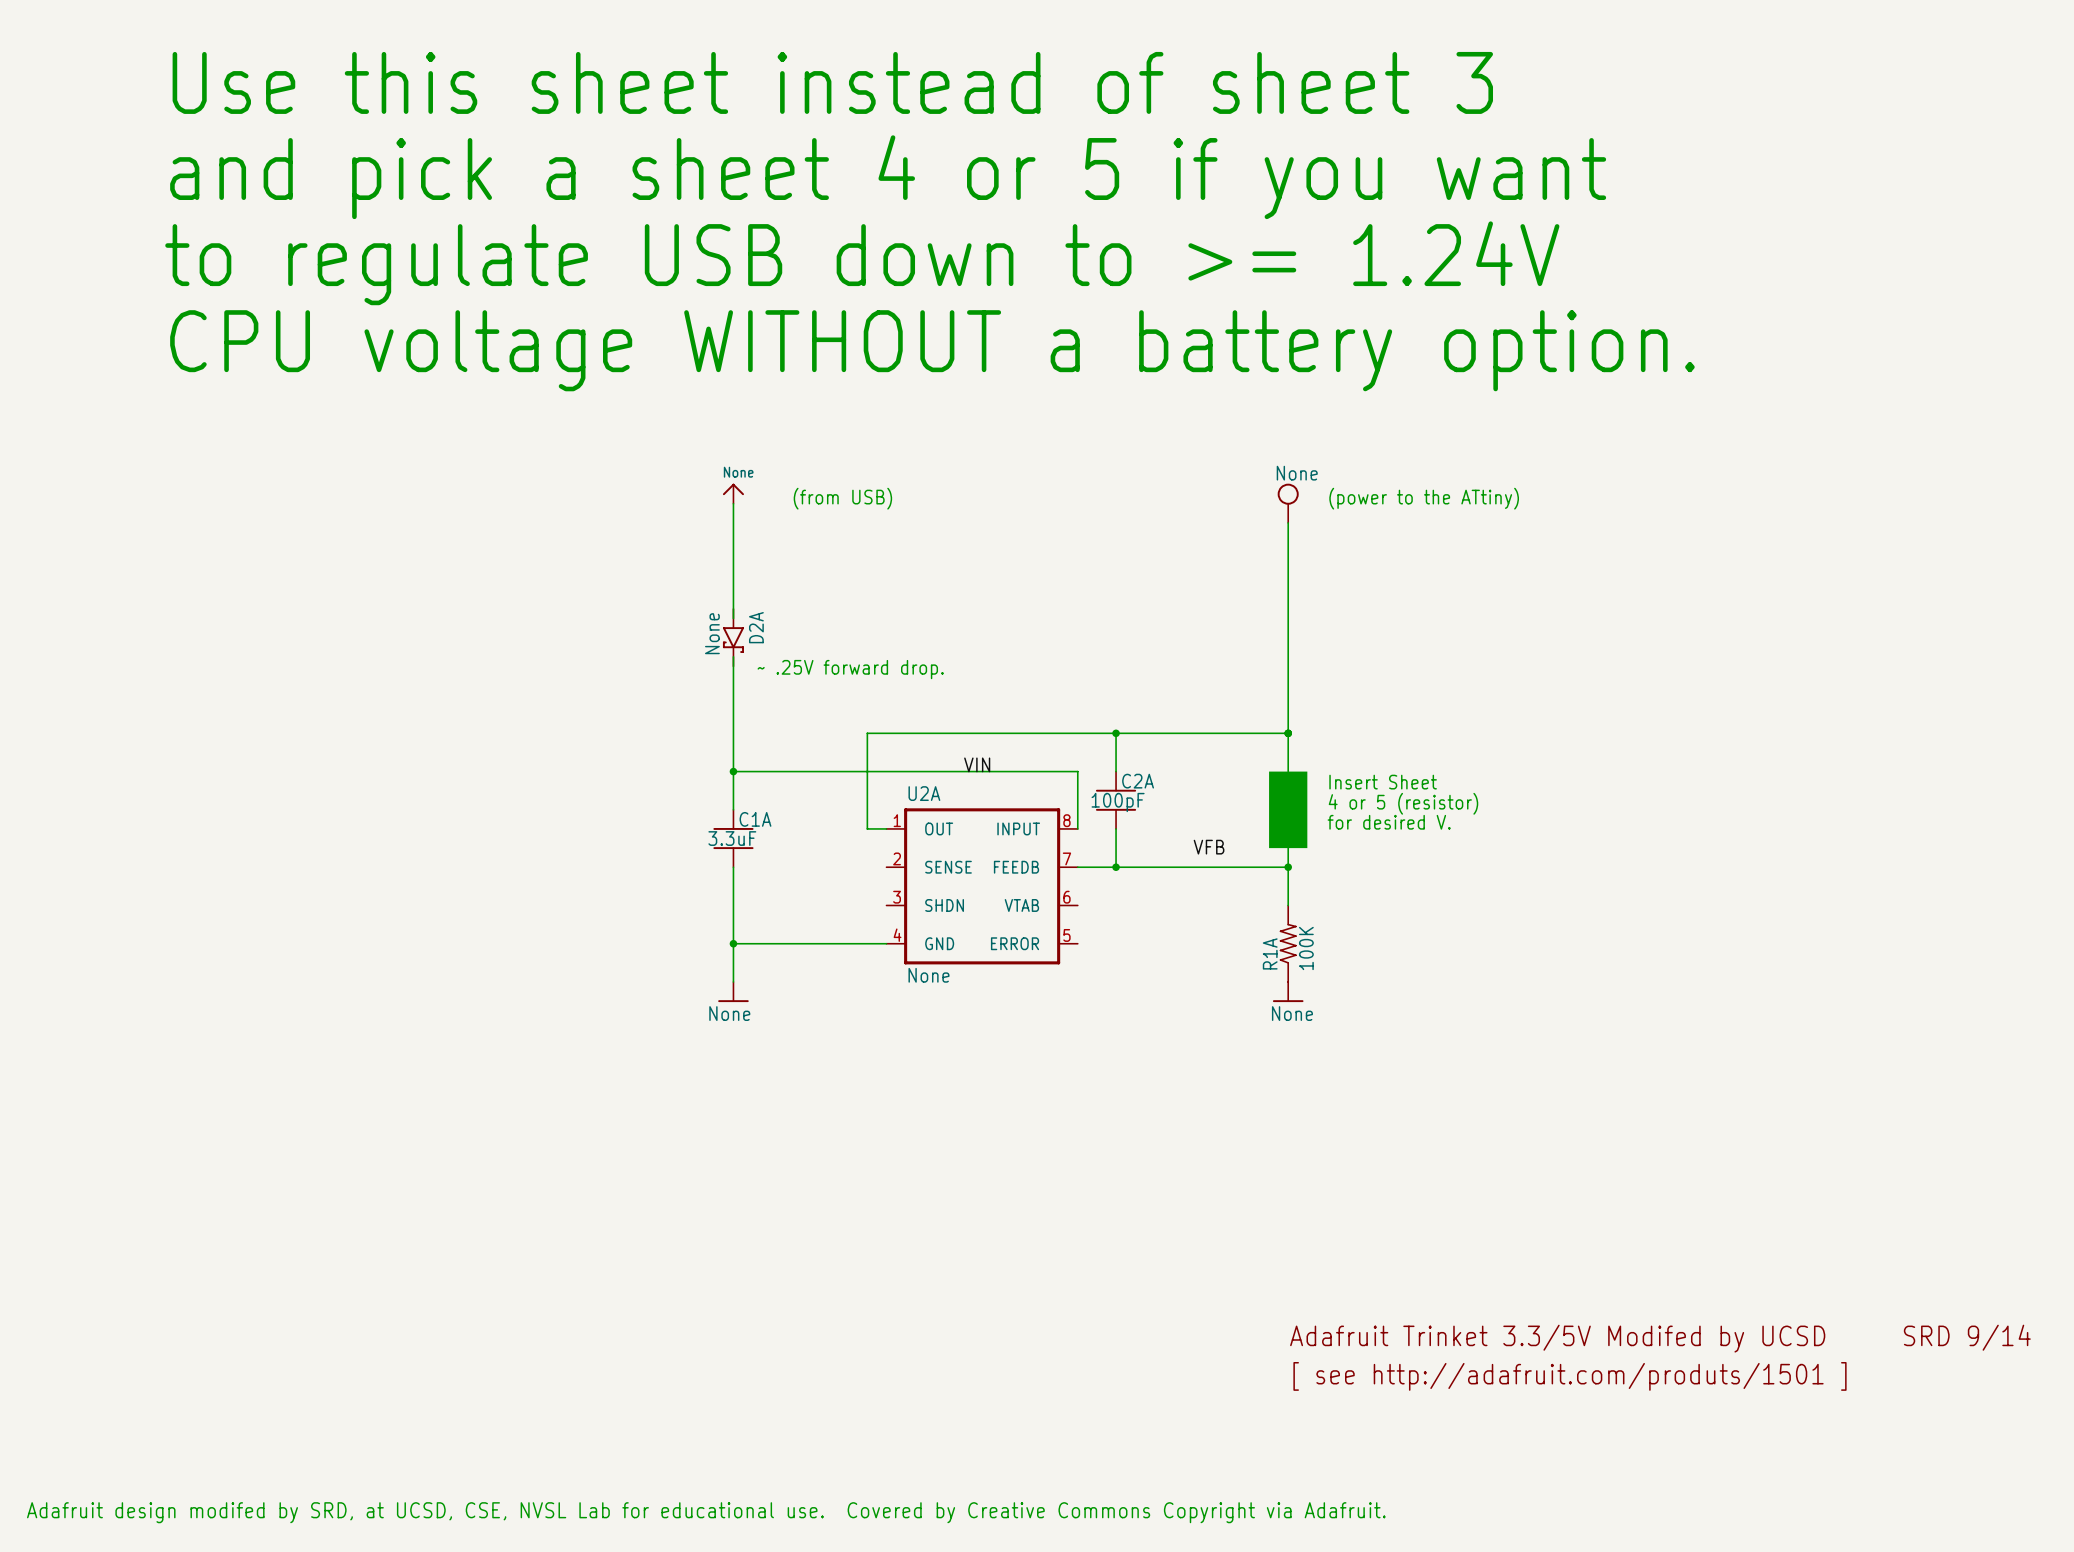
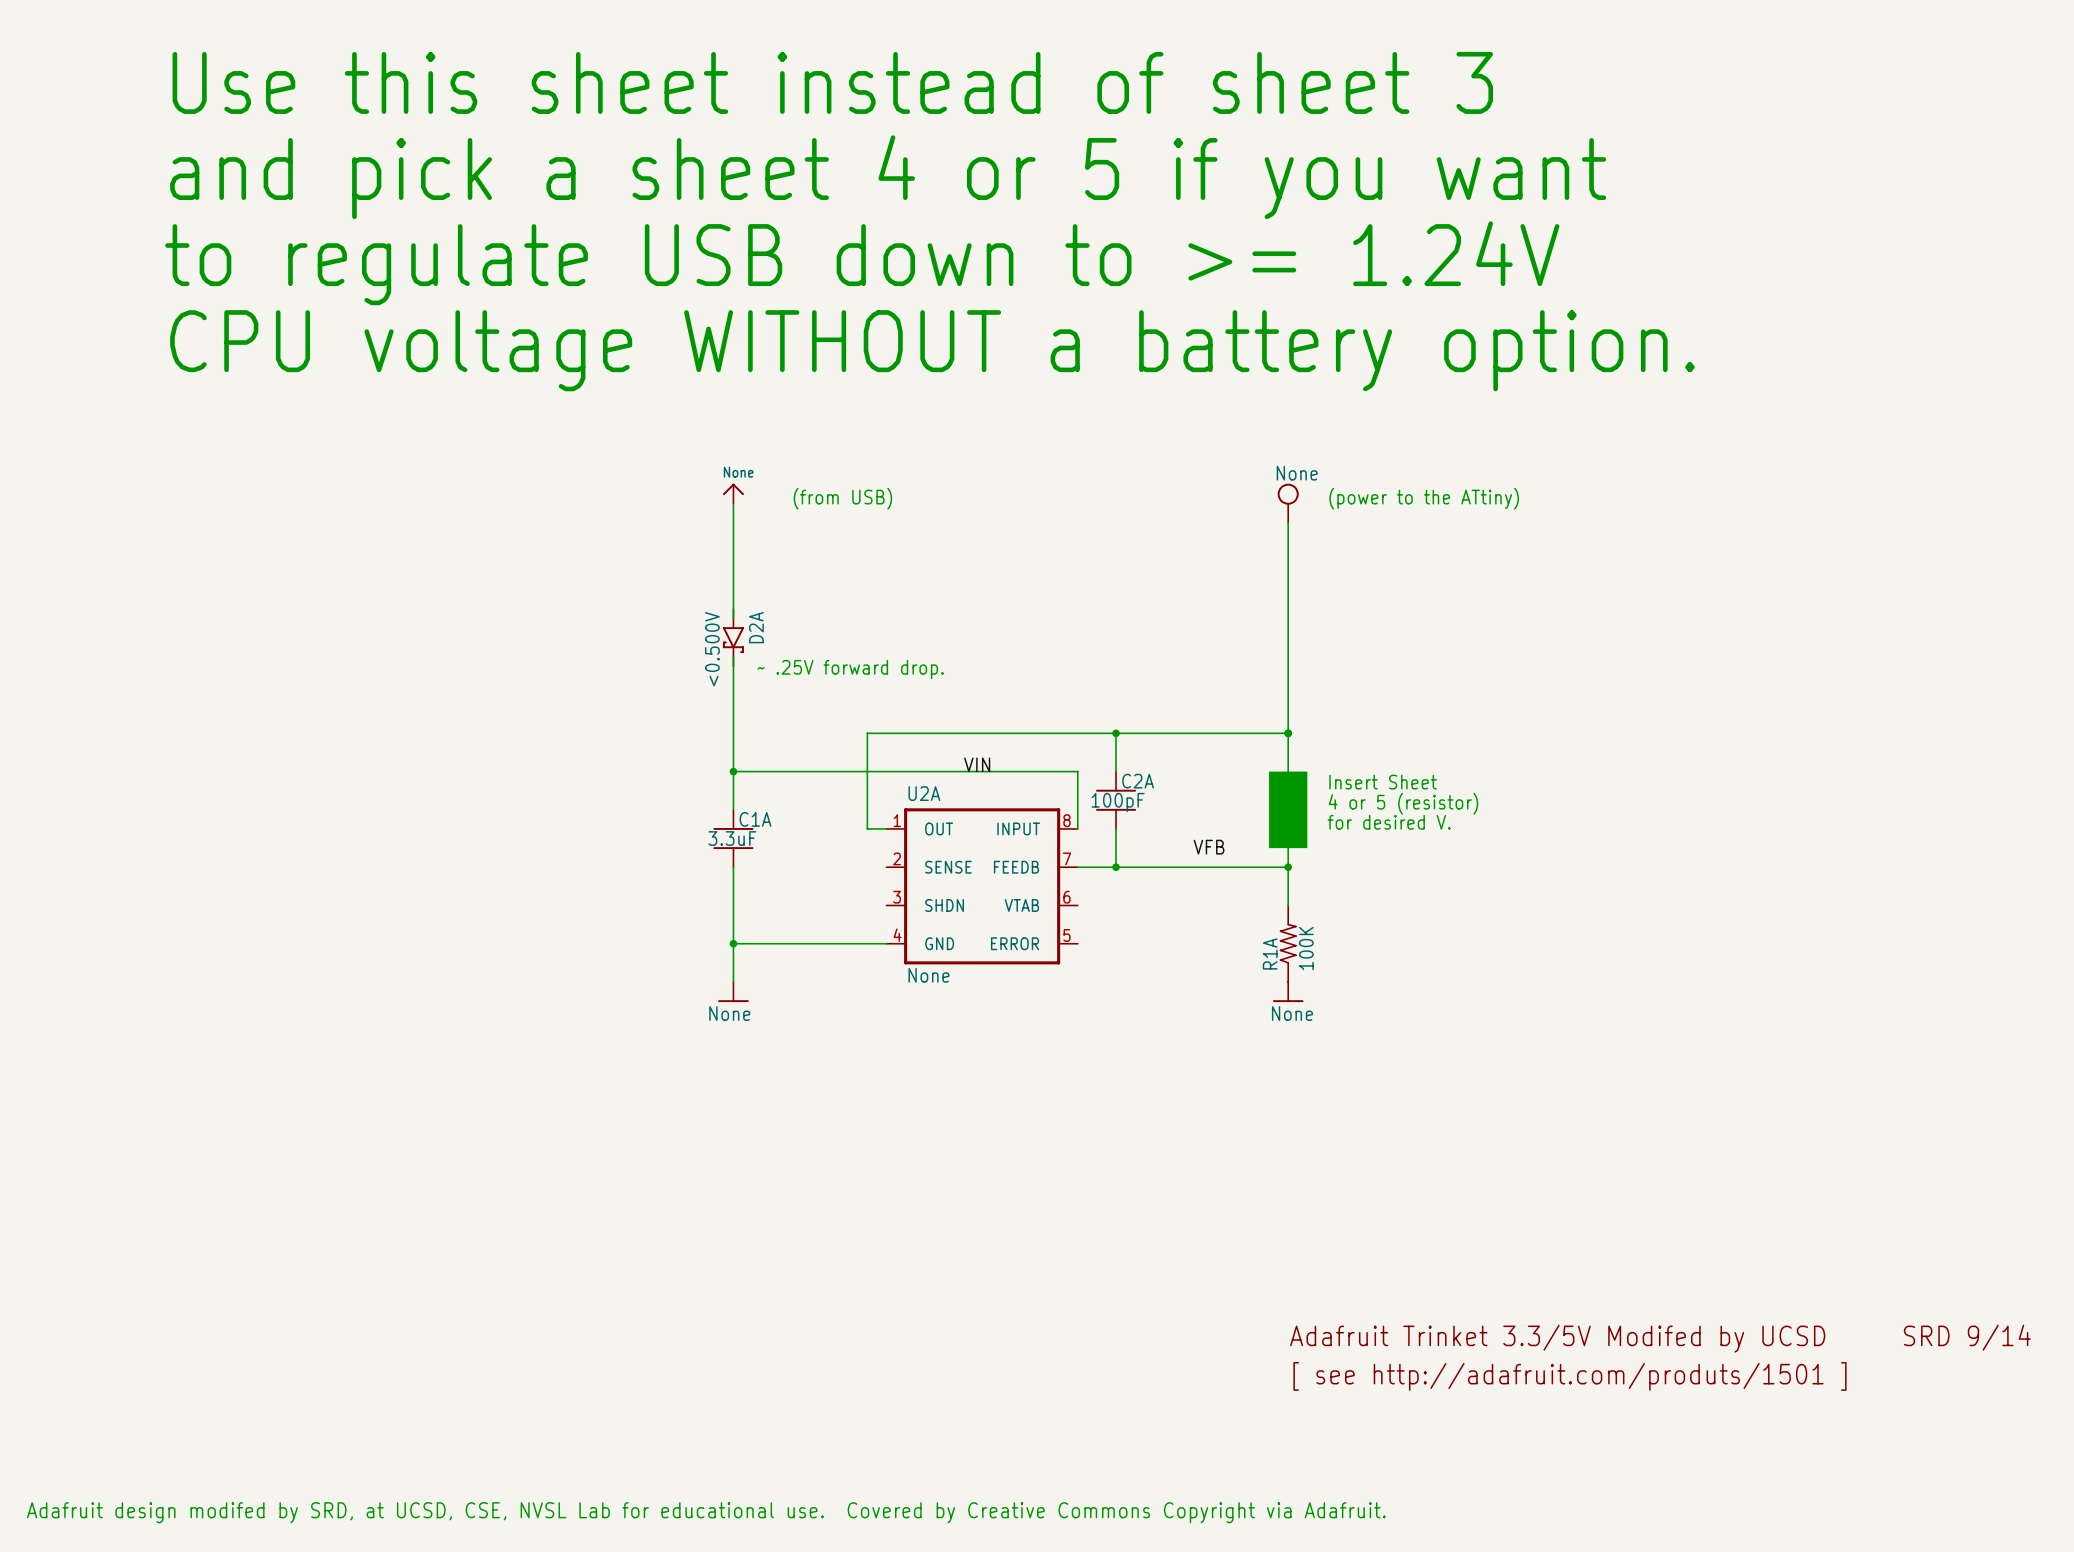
D2A value: None (712, 633) -> <0.500V (712, 649)

